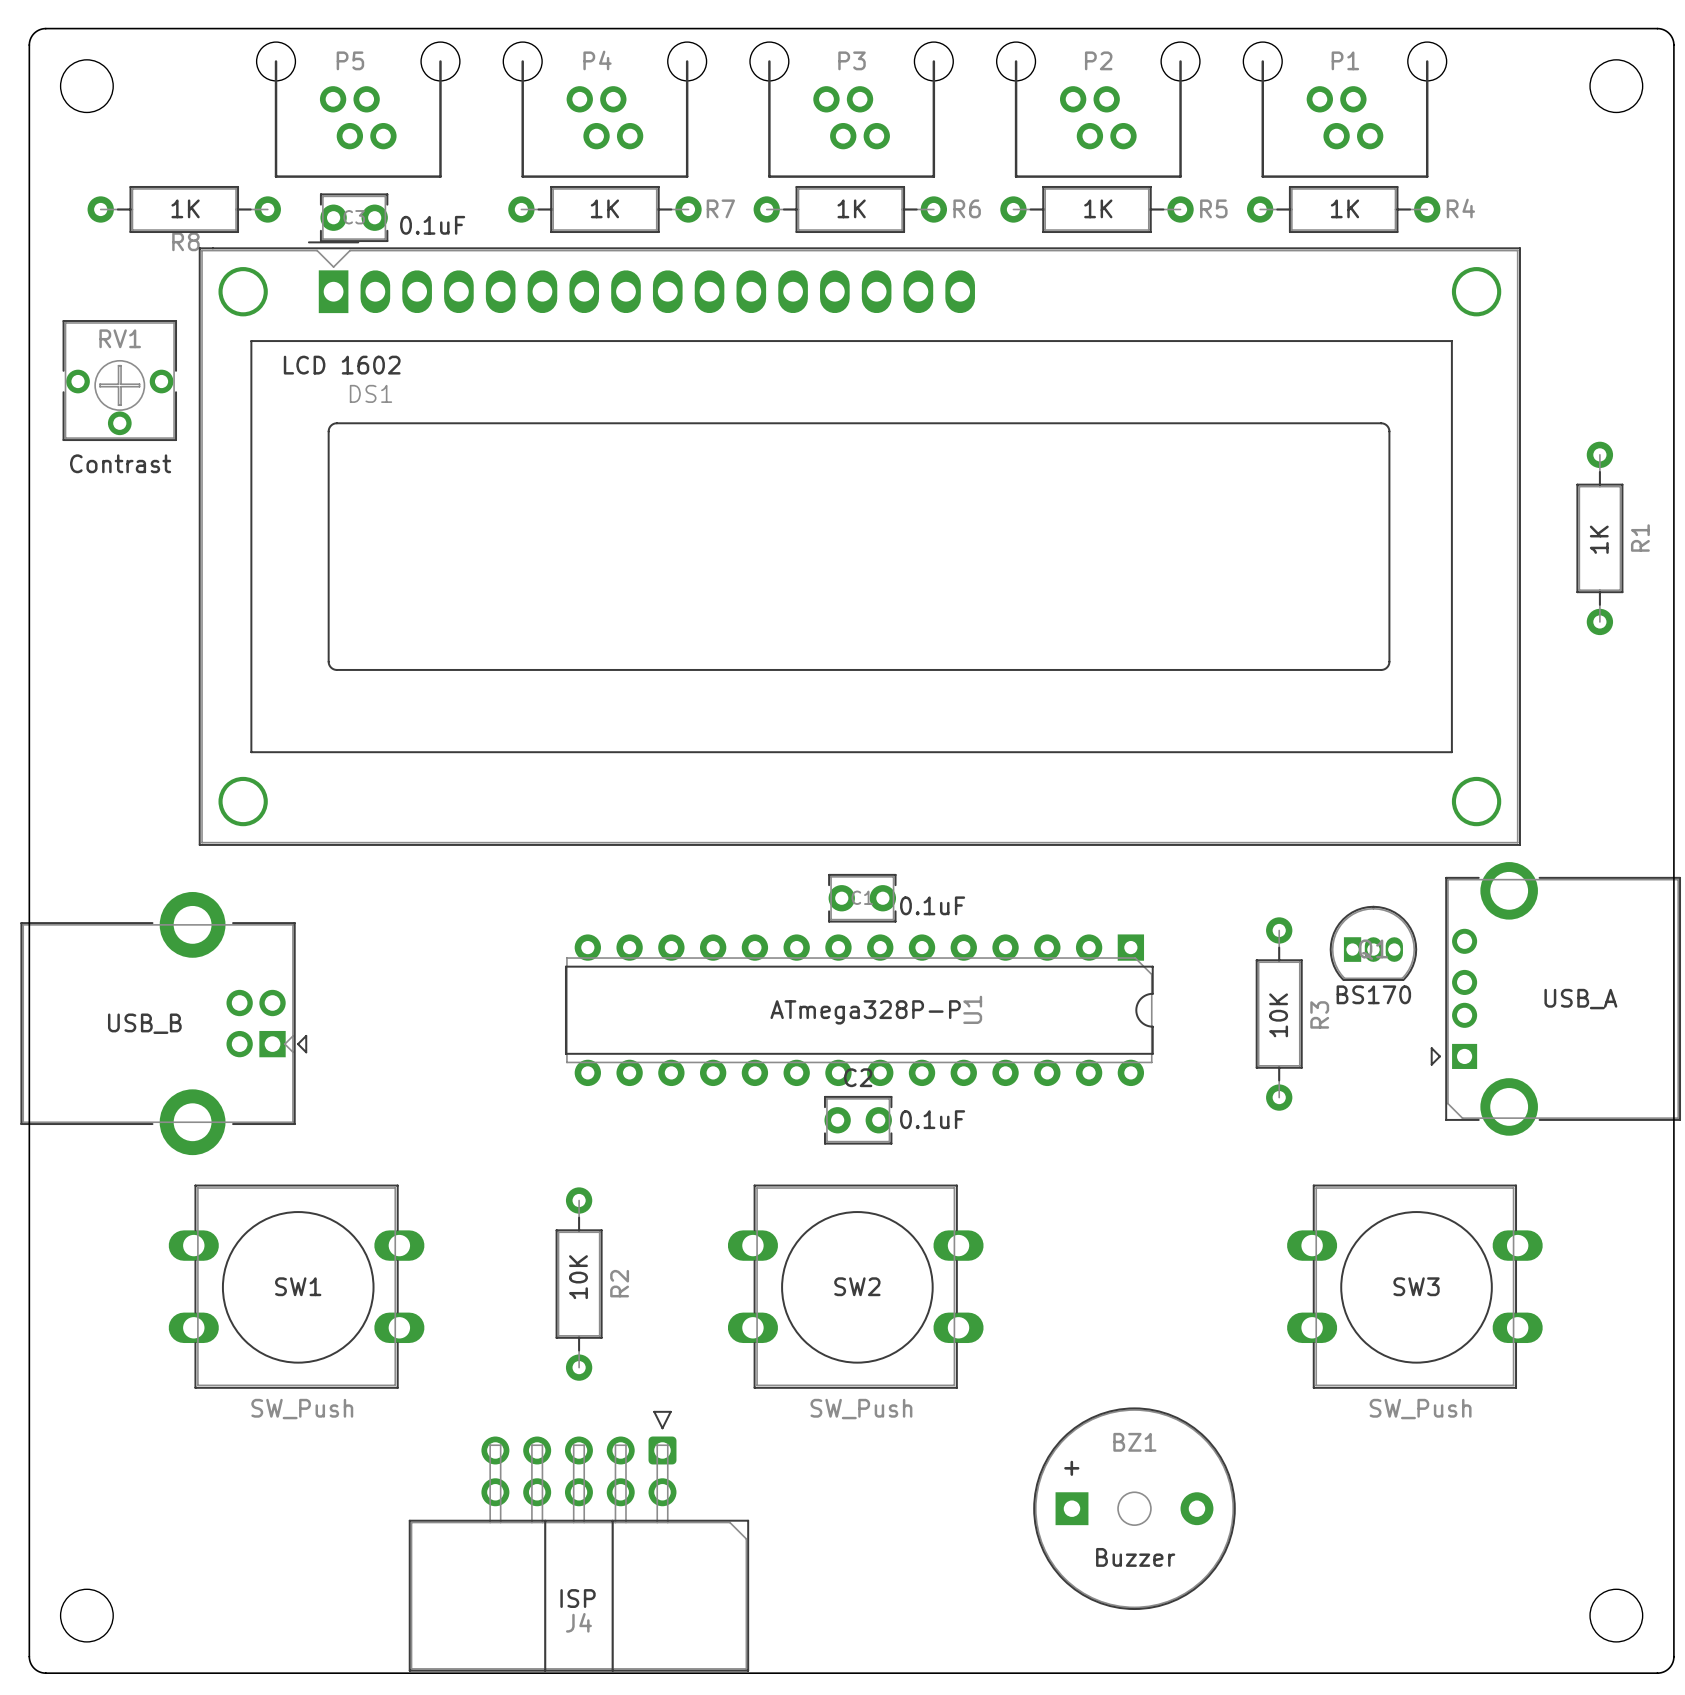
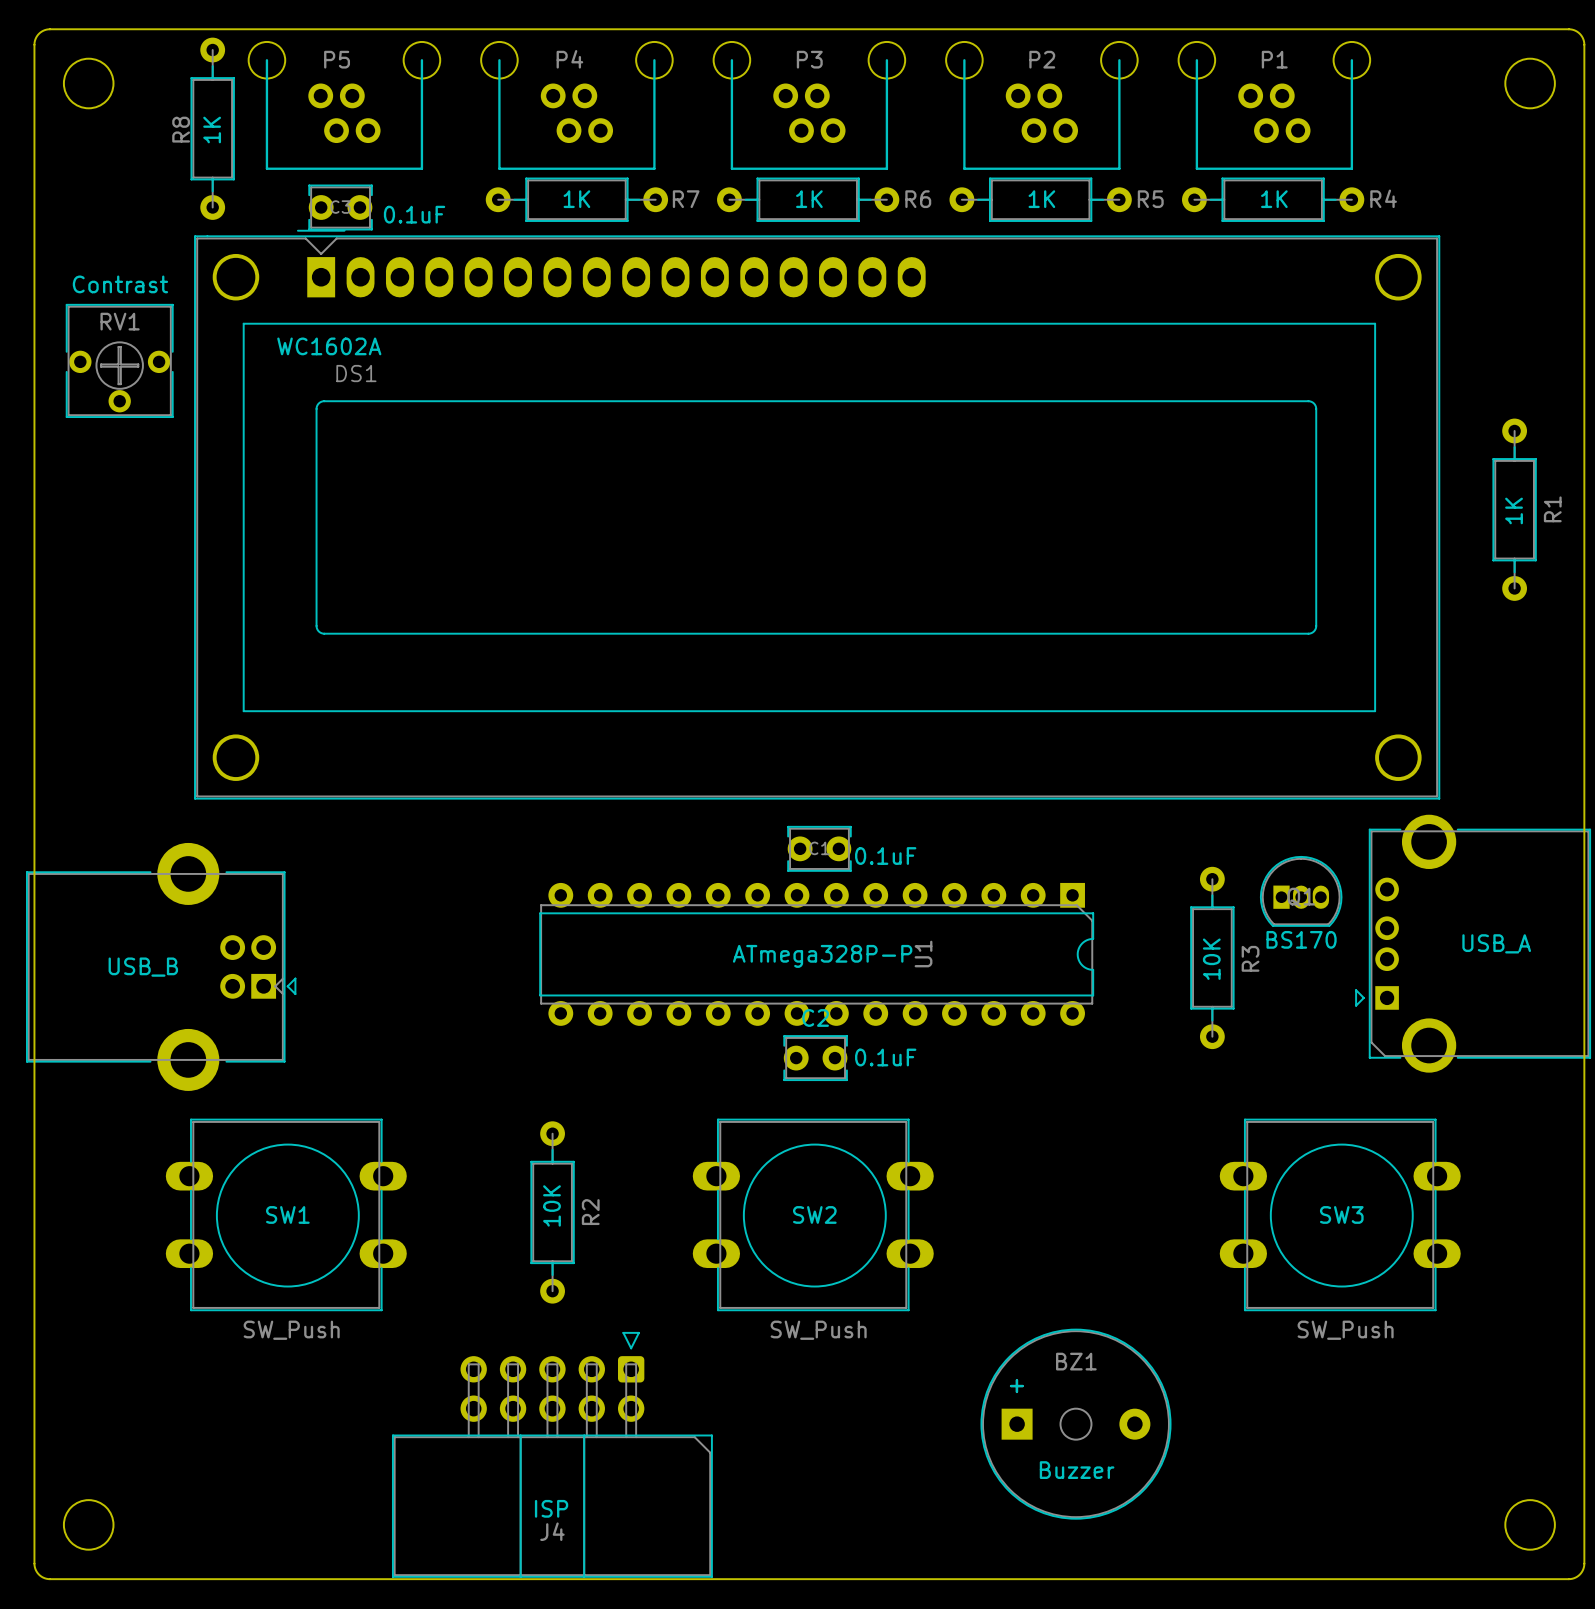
R8 rotation: 0° (184, 209) -> 90° clockwise (212, 128)
DS1 value: LCD 1602 (342, 365) -> WC1602A (329, 346)
RV1 value position: Contrast (120, 463) -> Contrast (120, 284)

